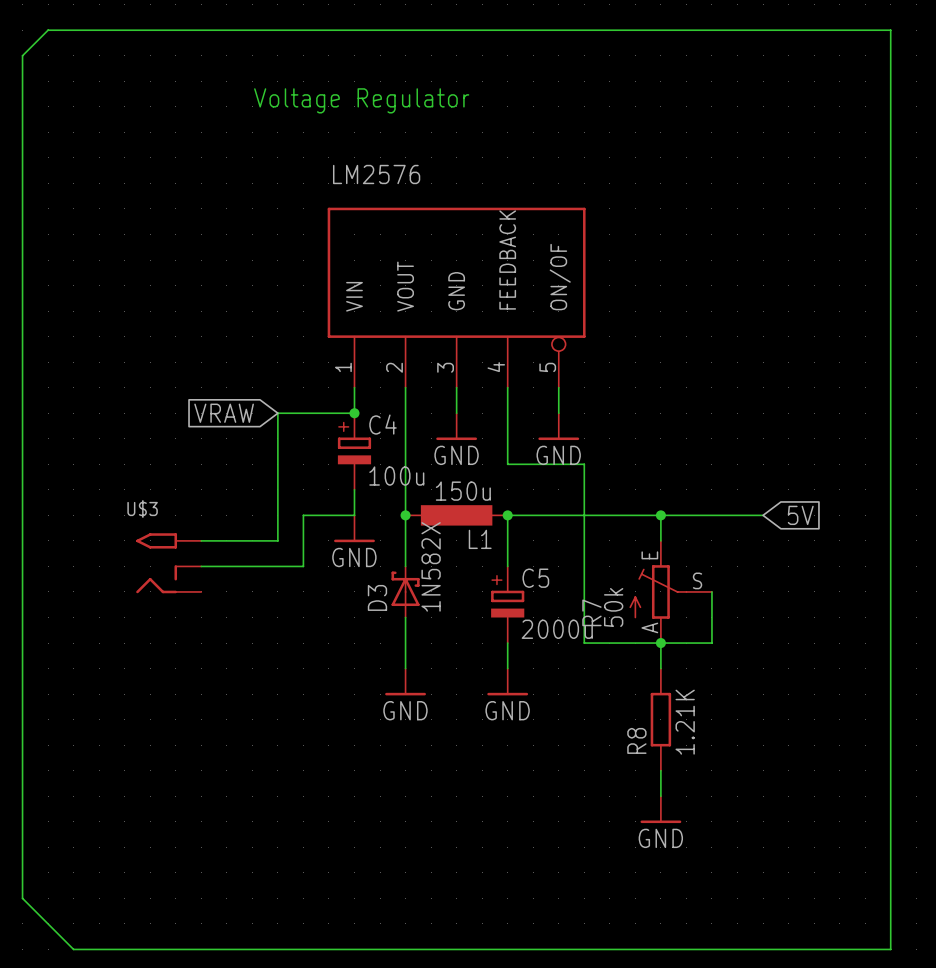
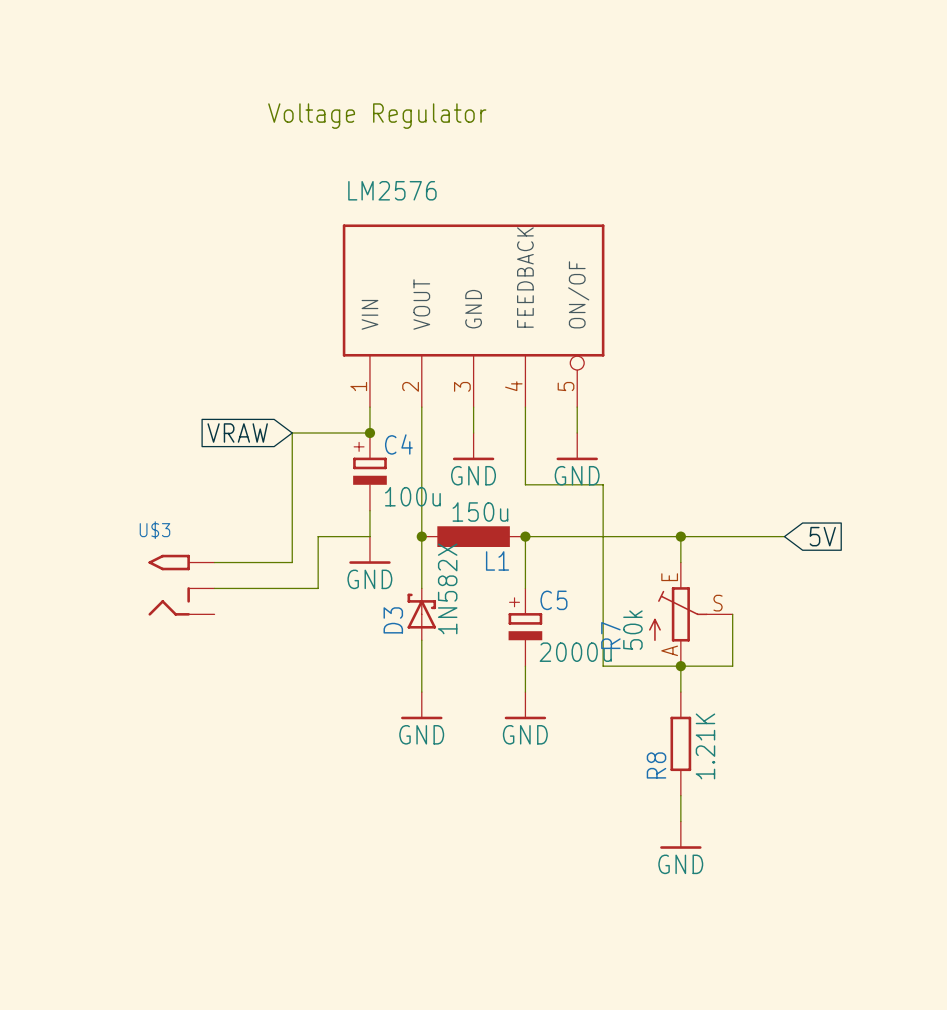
wire: (48, 30) (890, 30) (890, 949) (73, 949) (22, 898) (22, 55) (48, 30) -> none

